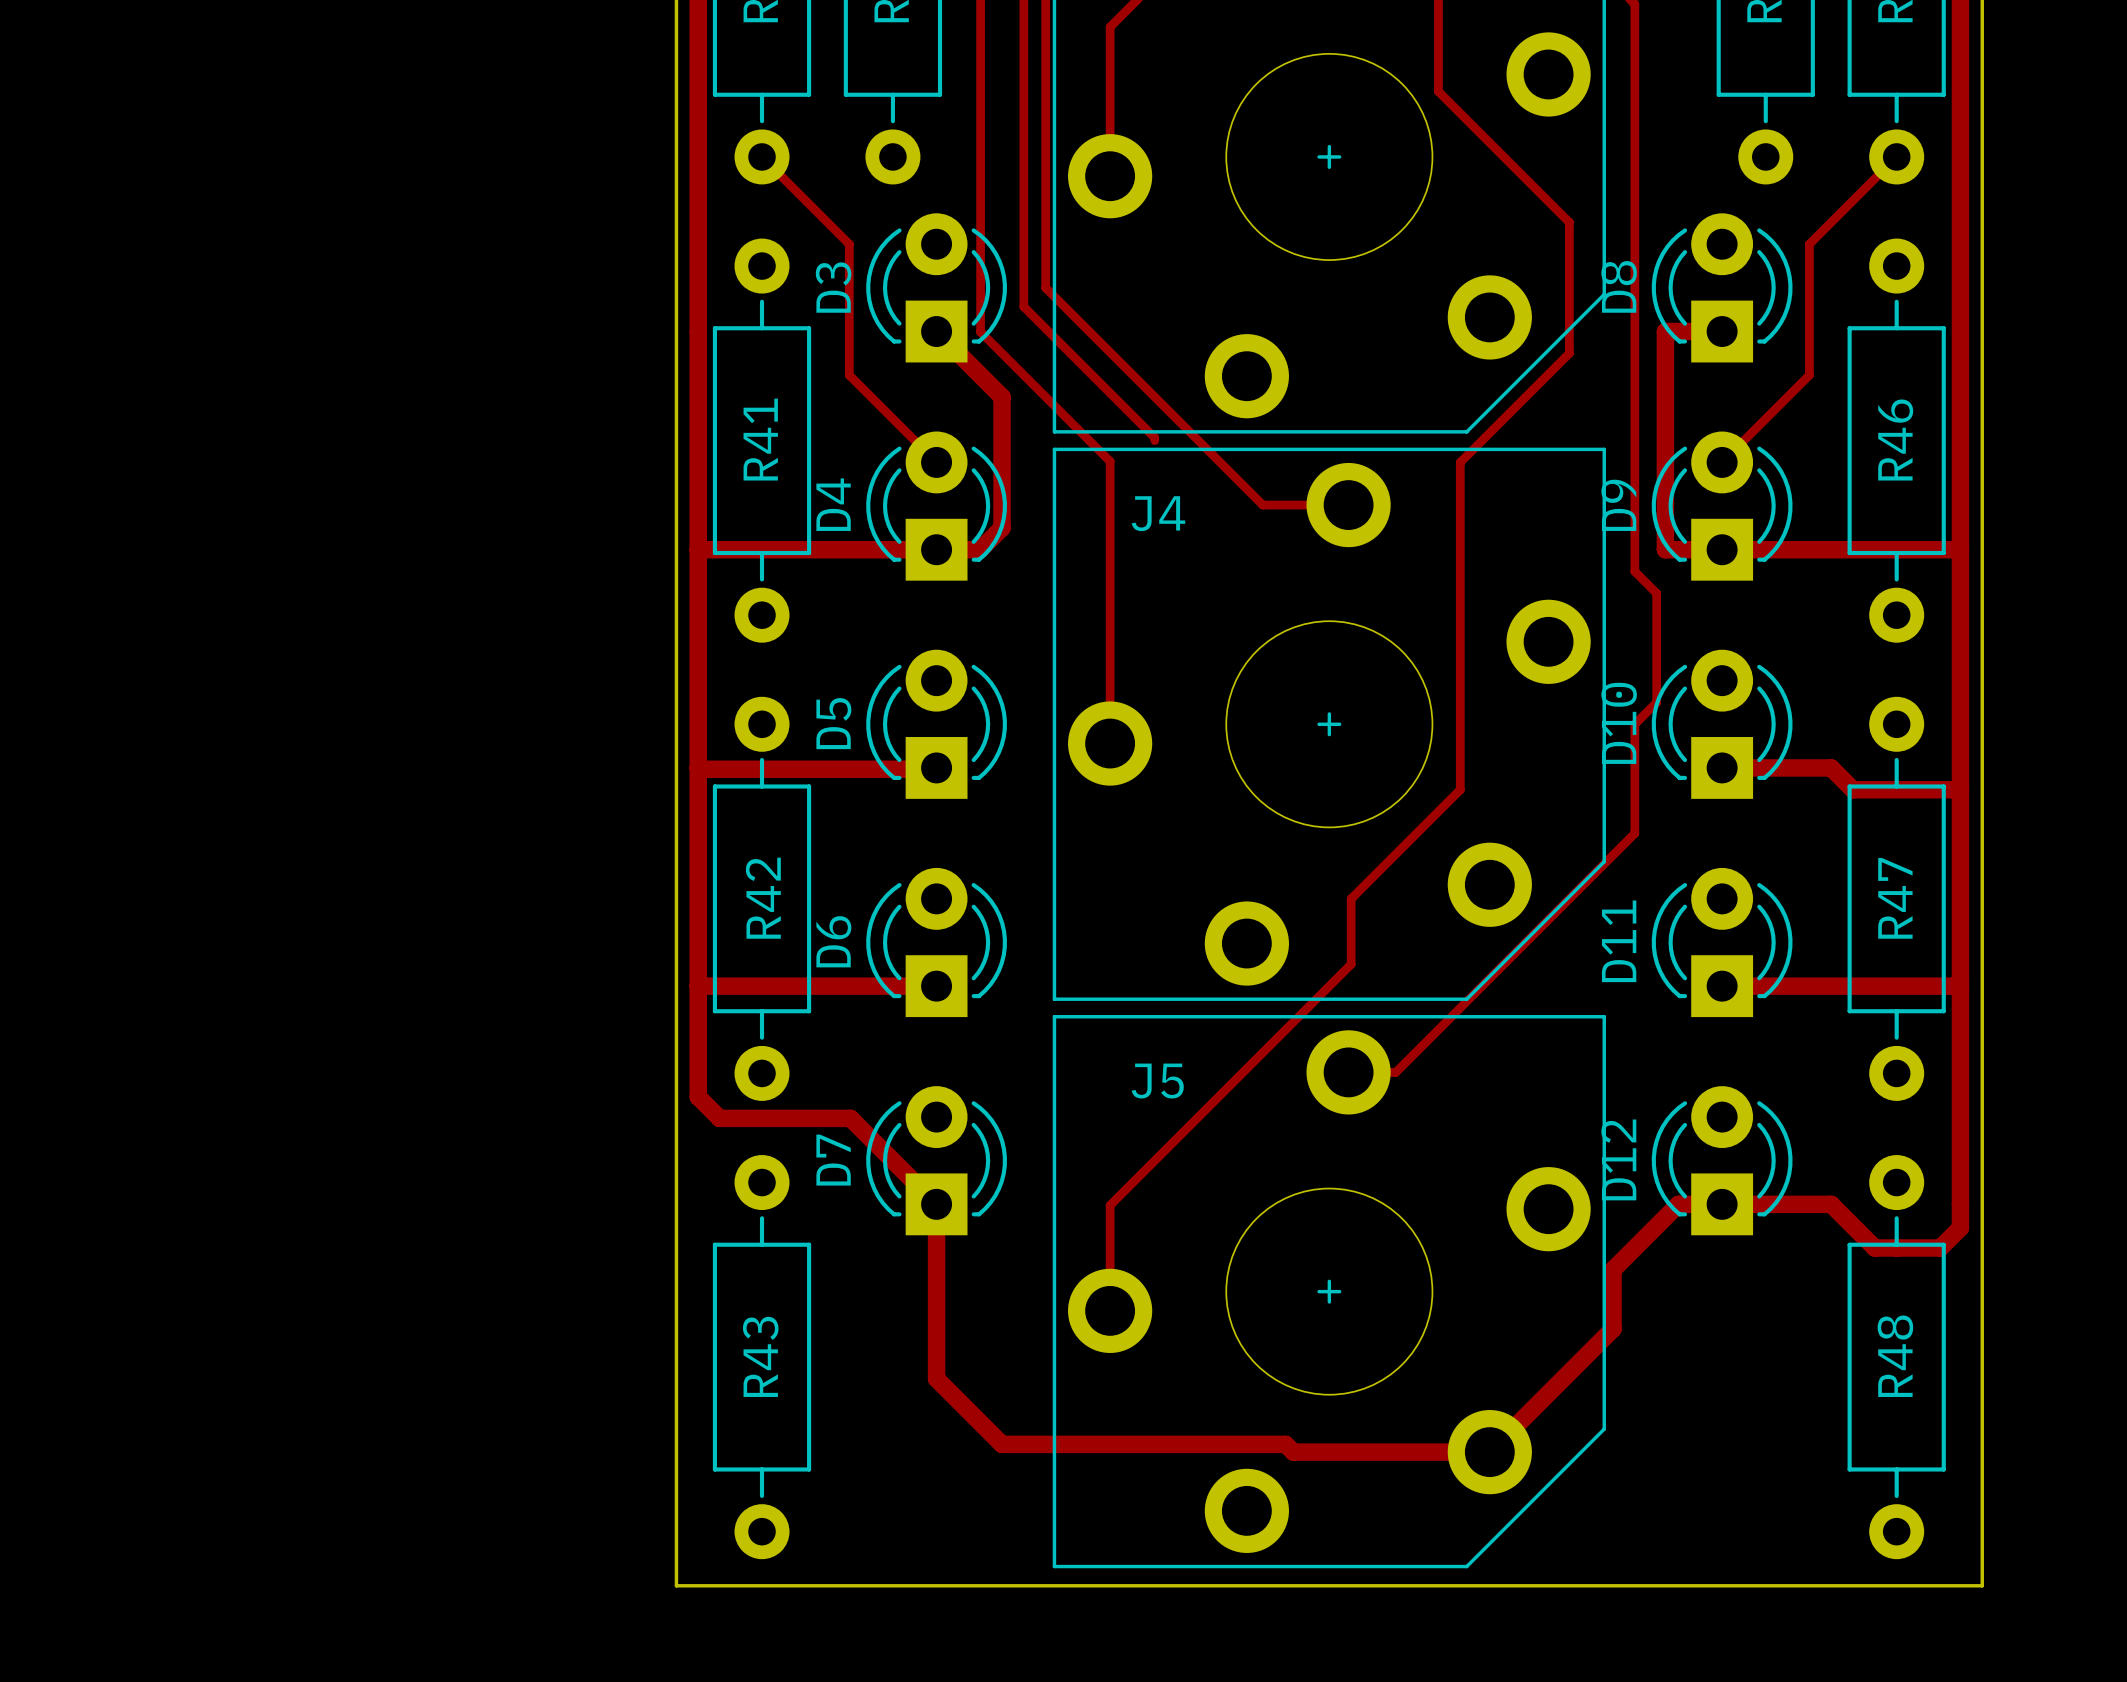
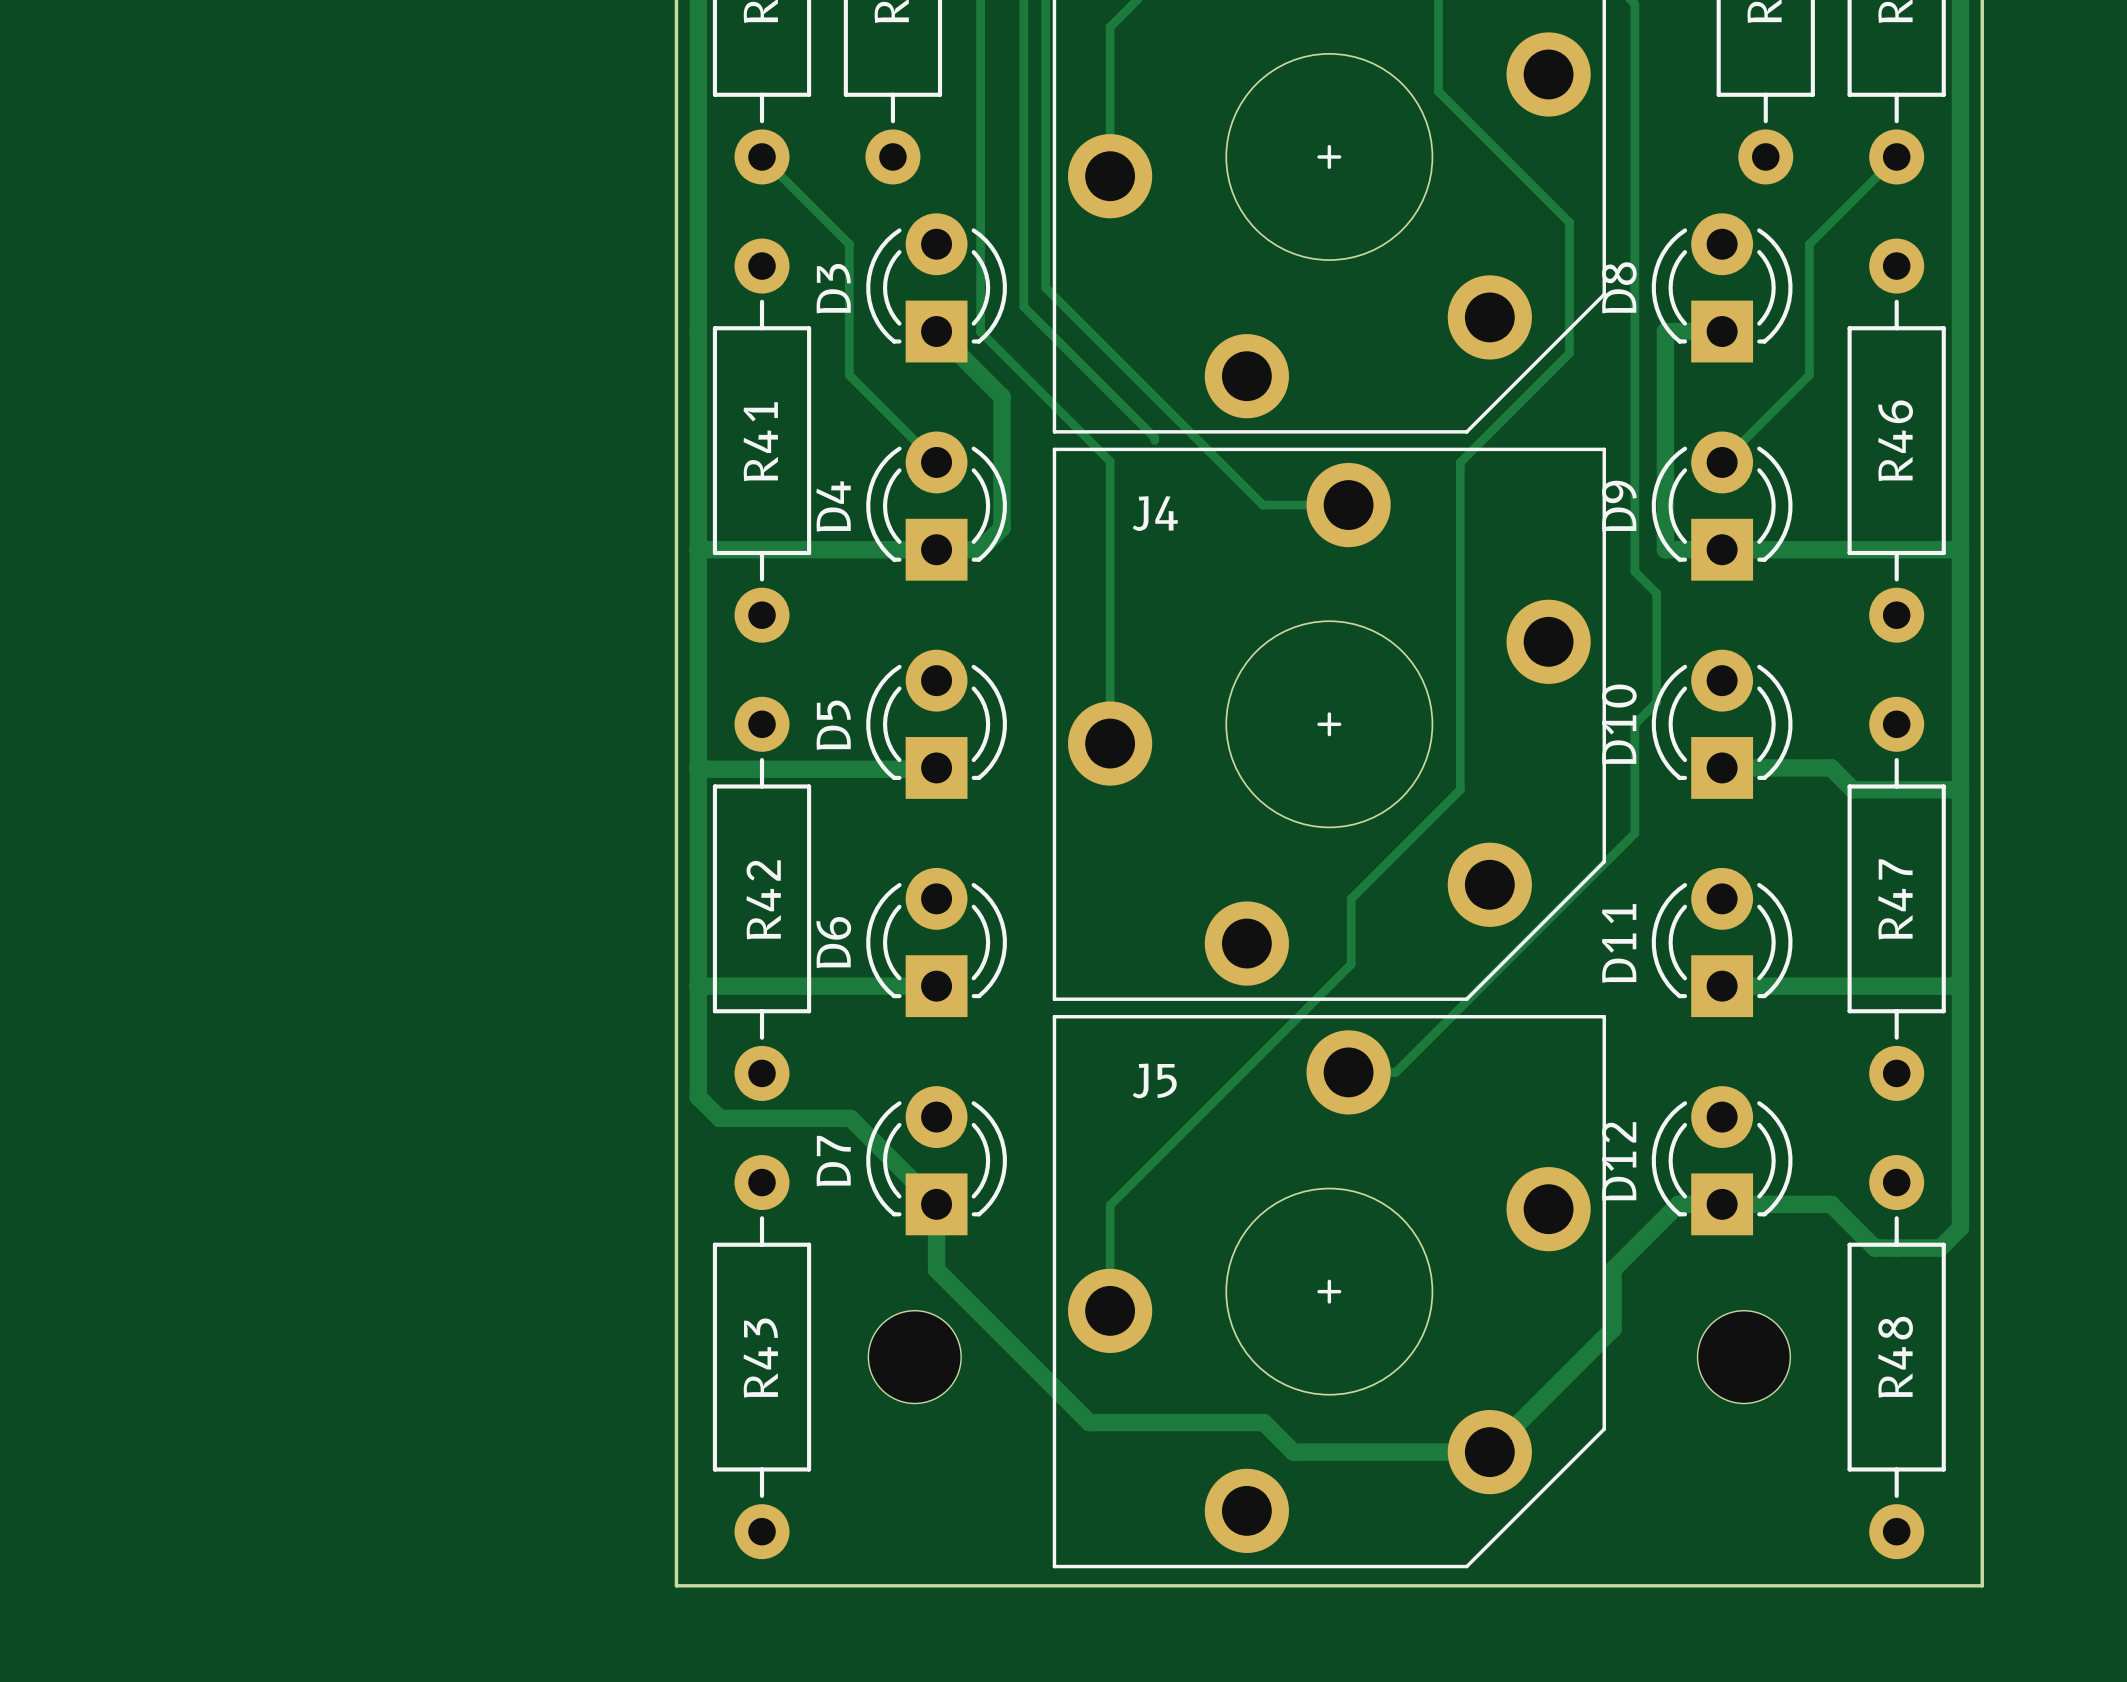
track: (936, 1269) (936, 1378) (1002, 1444) (1285, 1444) -> (936, 1269) (1089, 1422) (1263, 1422) (1285, 1444)
part: none -> (914, 1357)
part: none -> (1743, 1357)

